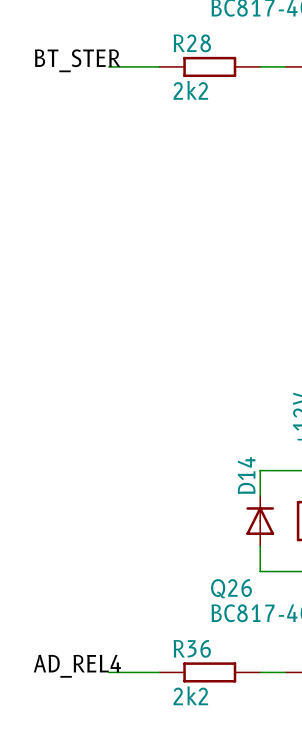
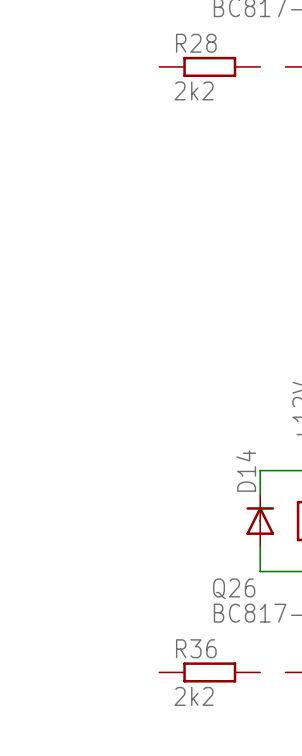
label: BT_STER (77, 60) -> none
wire: (108, 66) (159, 66) -> none
wire: (260, 66) (285, 66) -> none
label: AD_REL4 (77, 666) -> none
wire: (108, 672) (159, 672) -> none
wire: (260, 672) (285, 672) -> none

